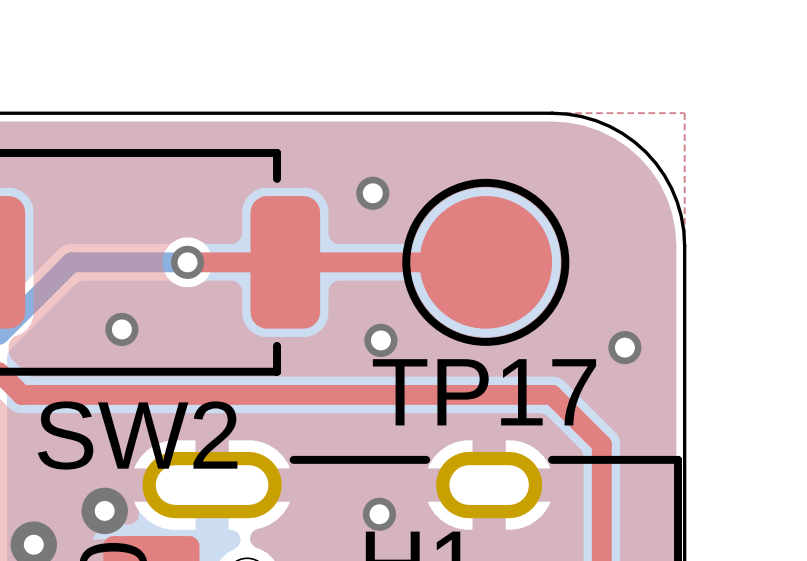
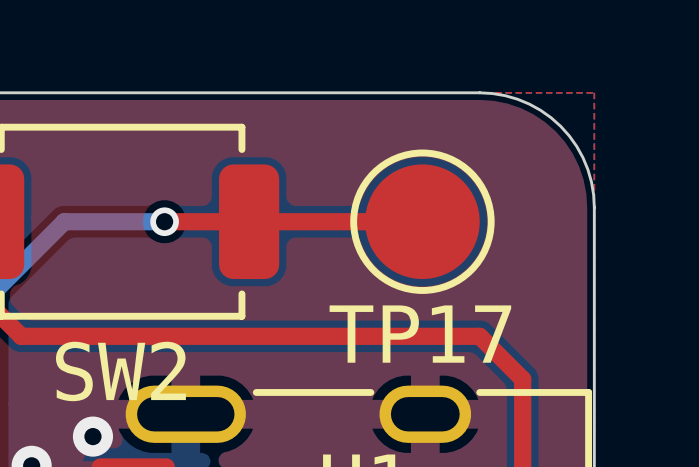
via: (372, 193) -> none
via: (121, 329) -> none
via: (380, 340) -> none
via: (624, 347) -> none
via: (379, 514) -> none

